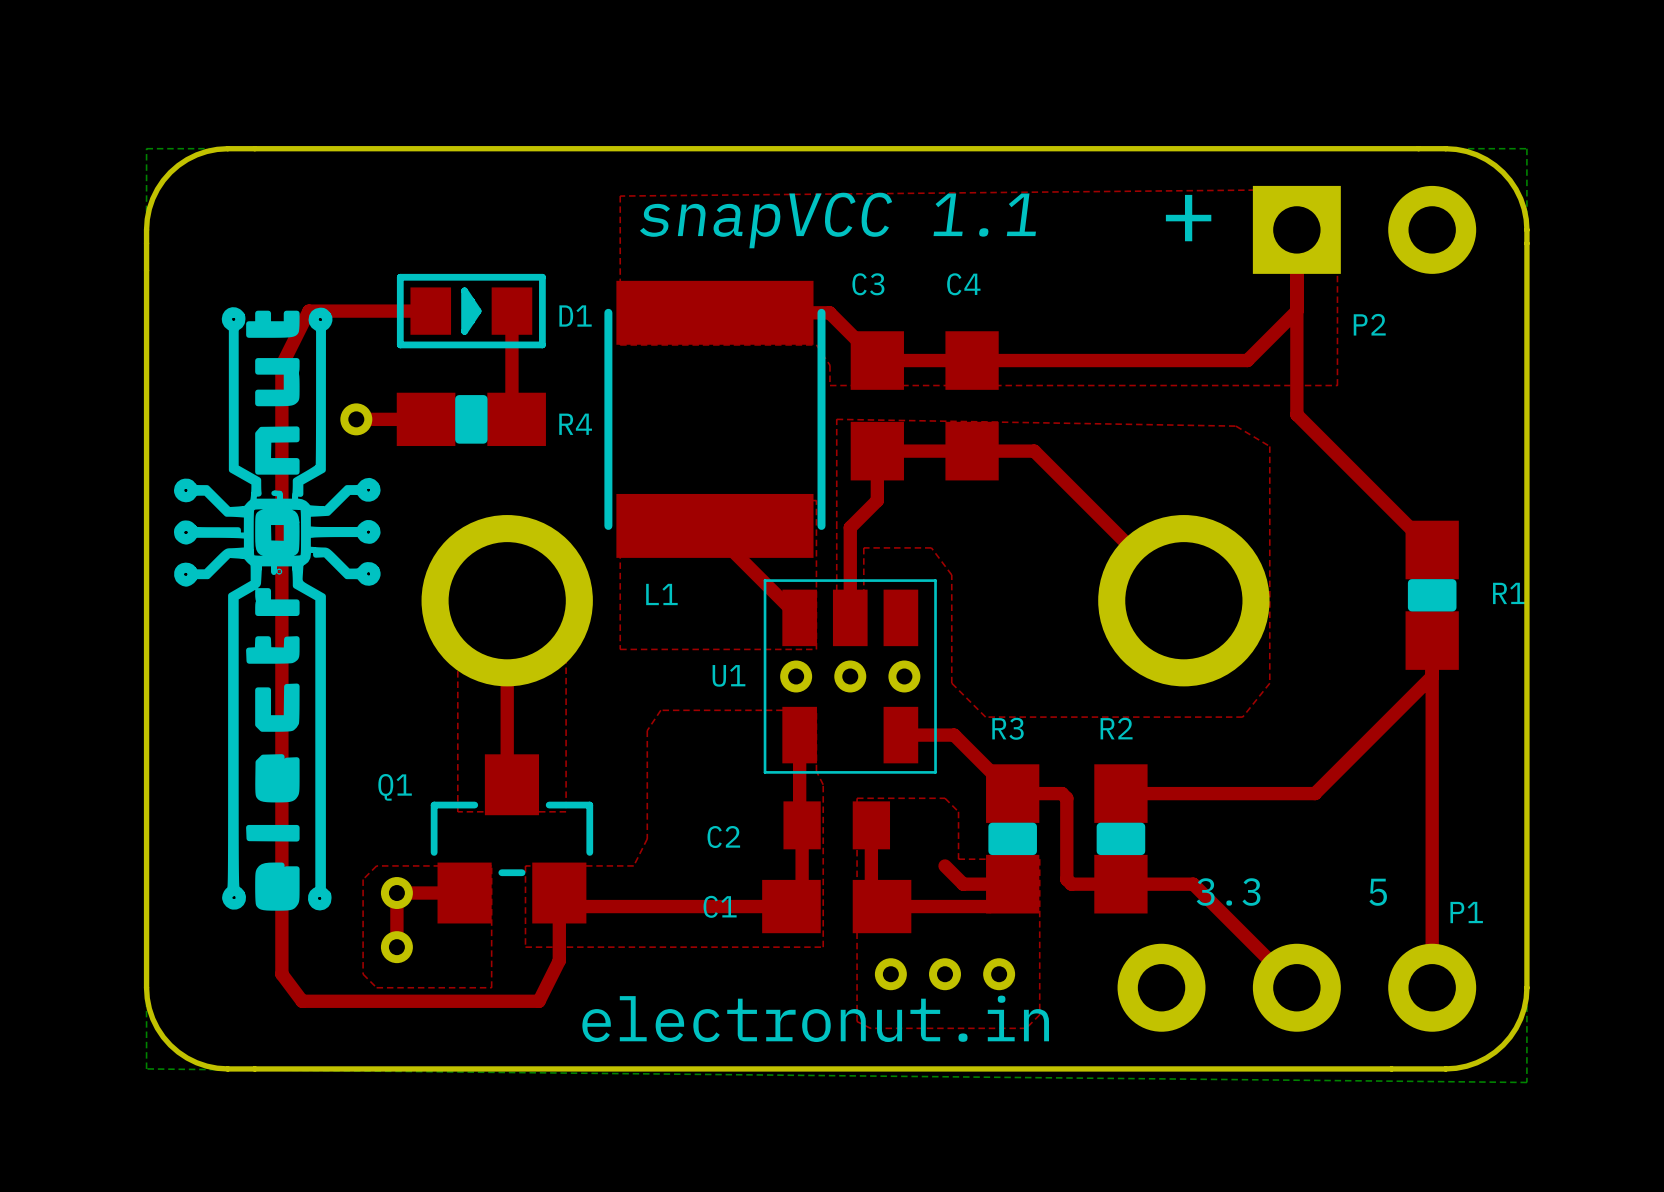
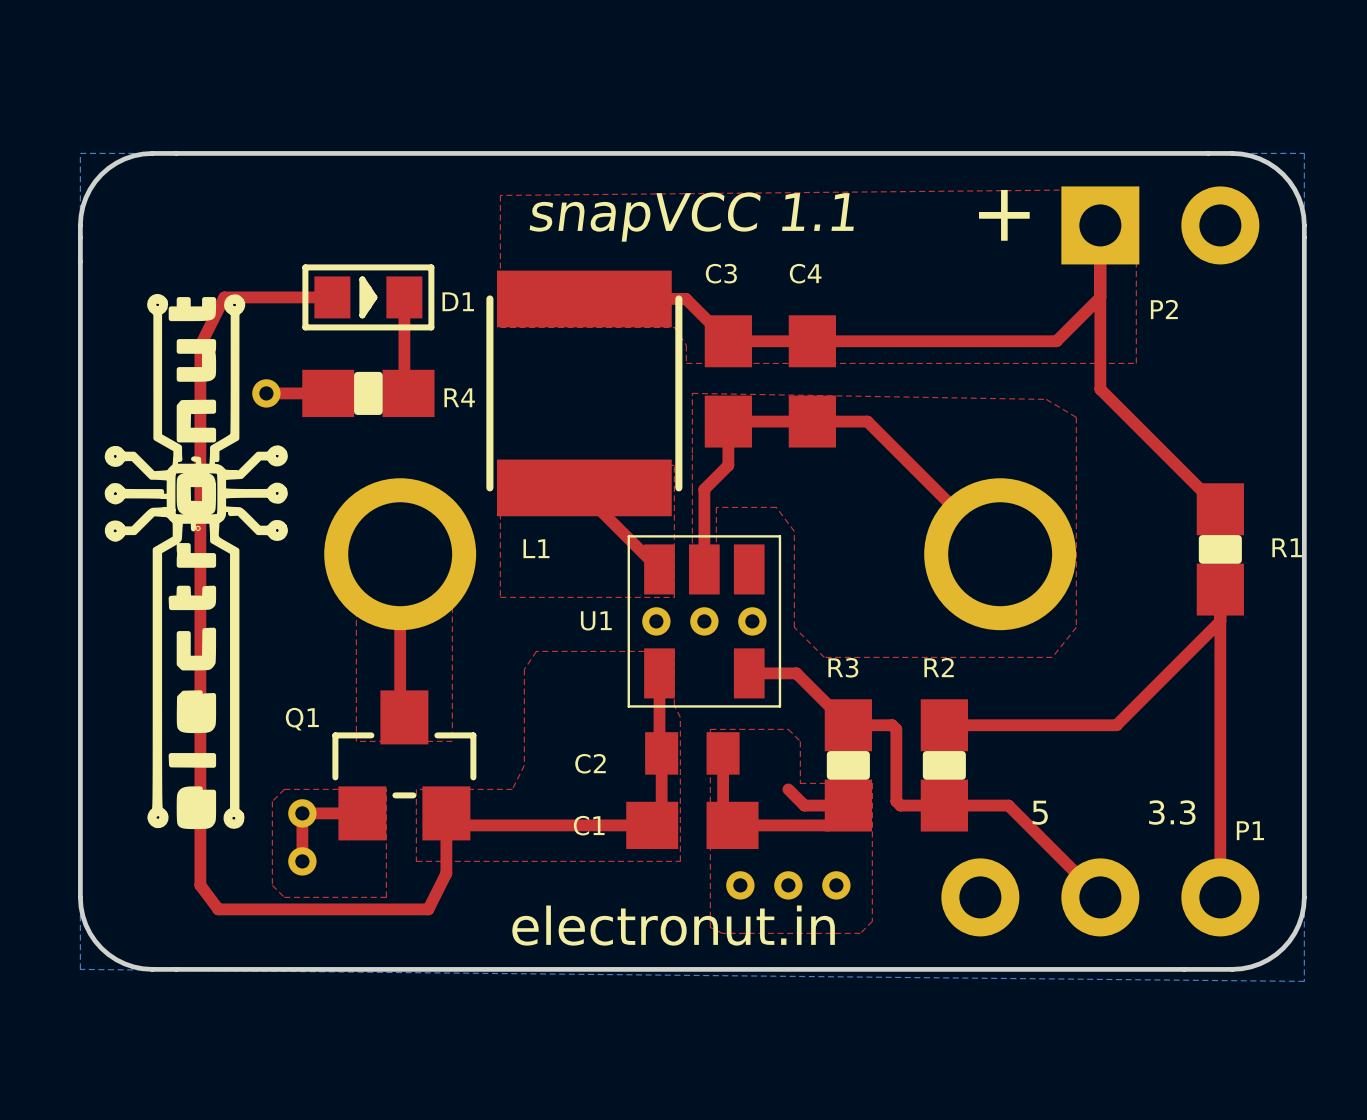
text: 3.3 (1228, 892) -> 5 (1040, 812)
text: 5 (1378, 892) -> 3.3 (1172, 812)

